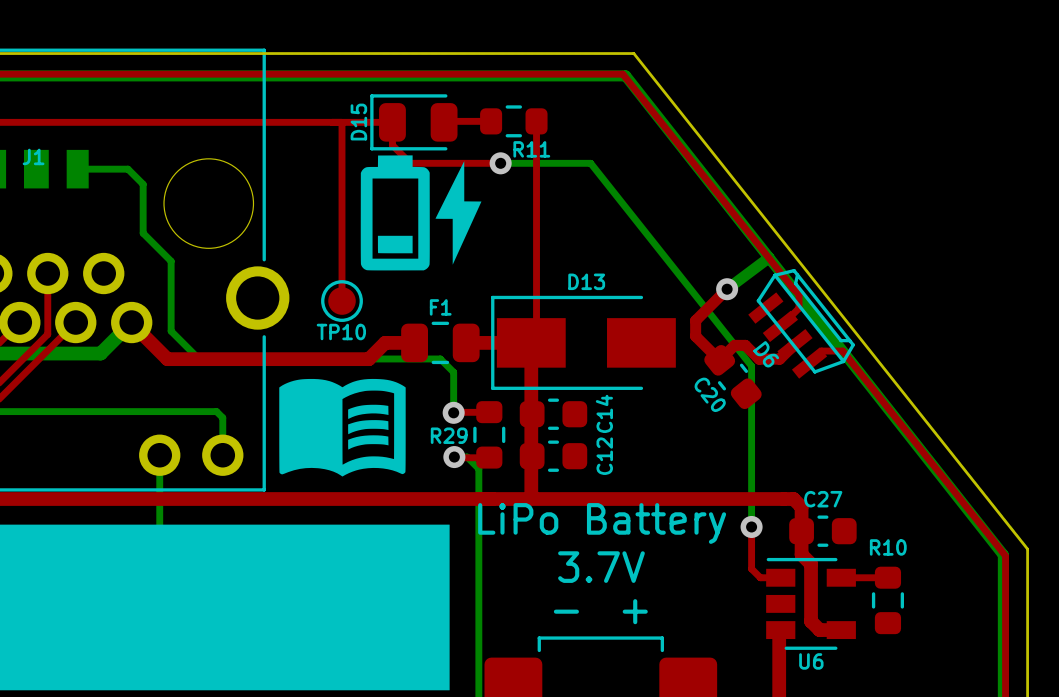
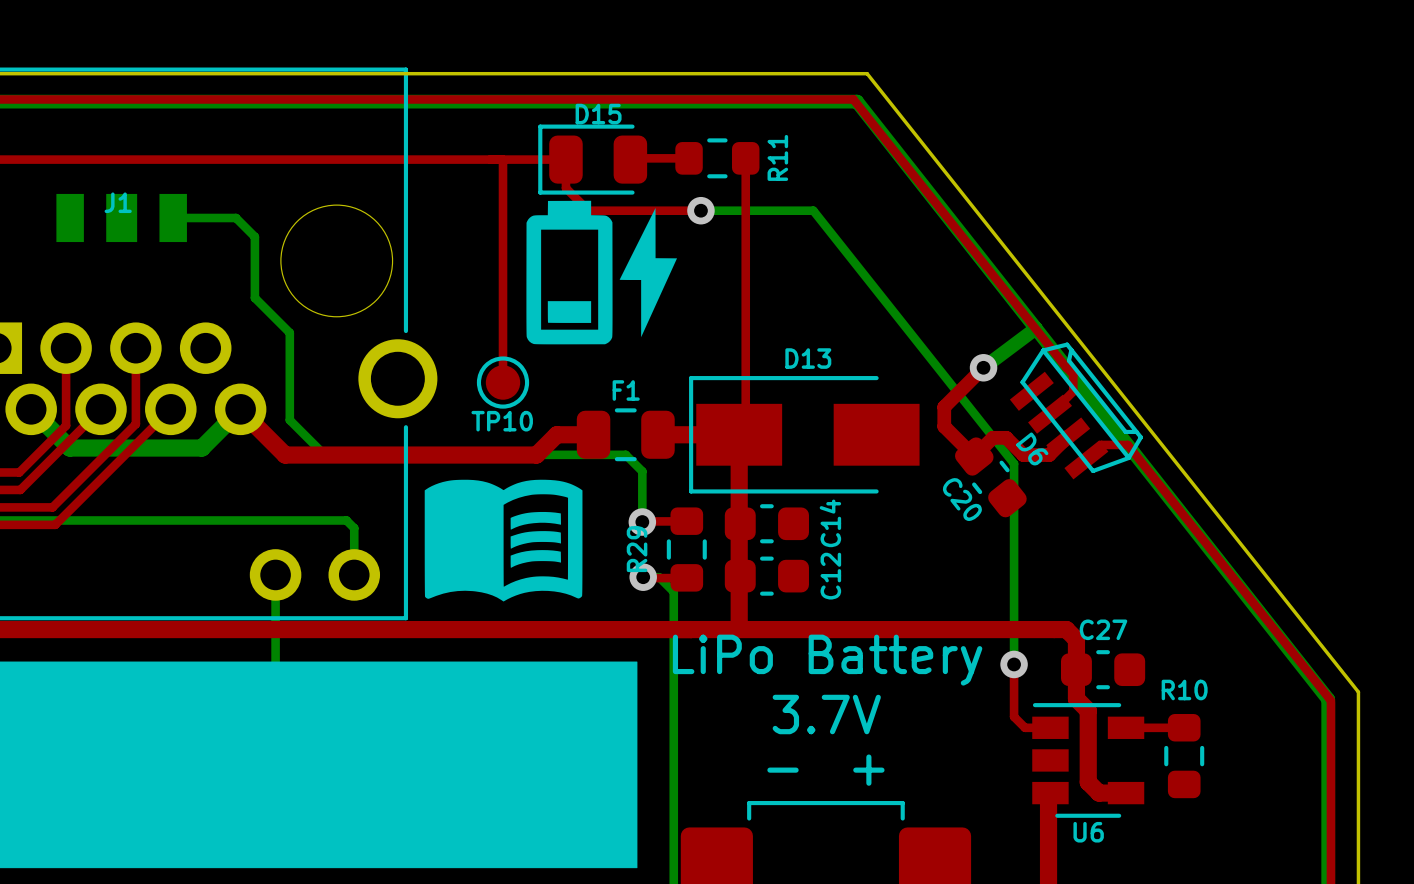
D15 name rotation: 0° (358, 122) -> 90° clockwise (598, 114)
D15 name position: D15 (358, 122) -> D15 (598, 114)
R11 name rotation: 0° (531, 149) -> 90° counterclockwise (777, 157)
R29 name rotation: 0° (449, 435) -> 90° counterclockwise (637, 549)

